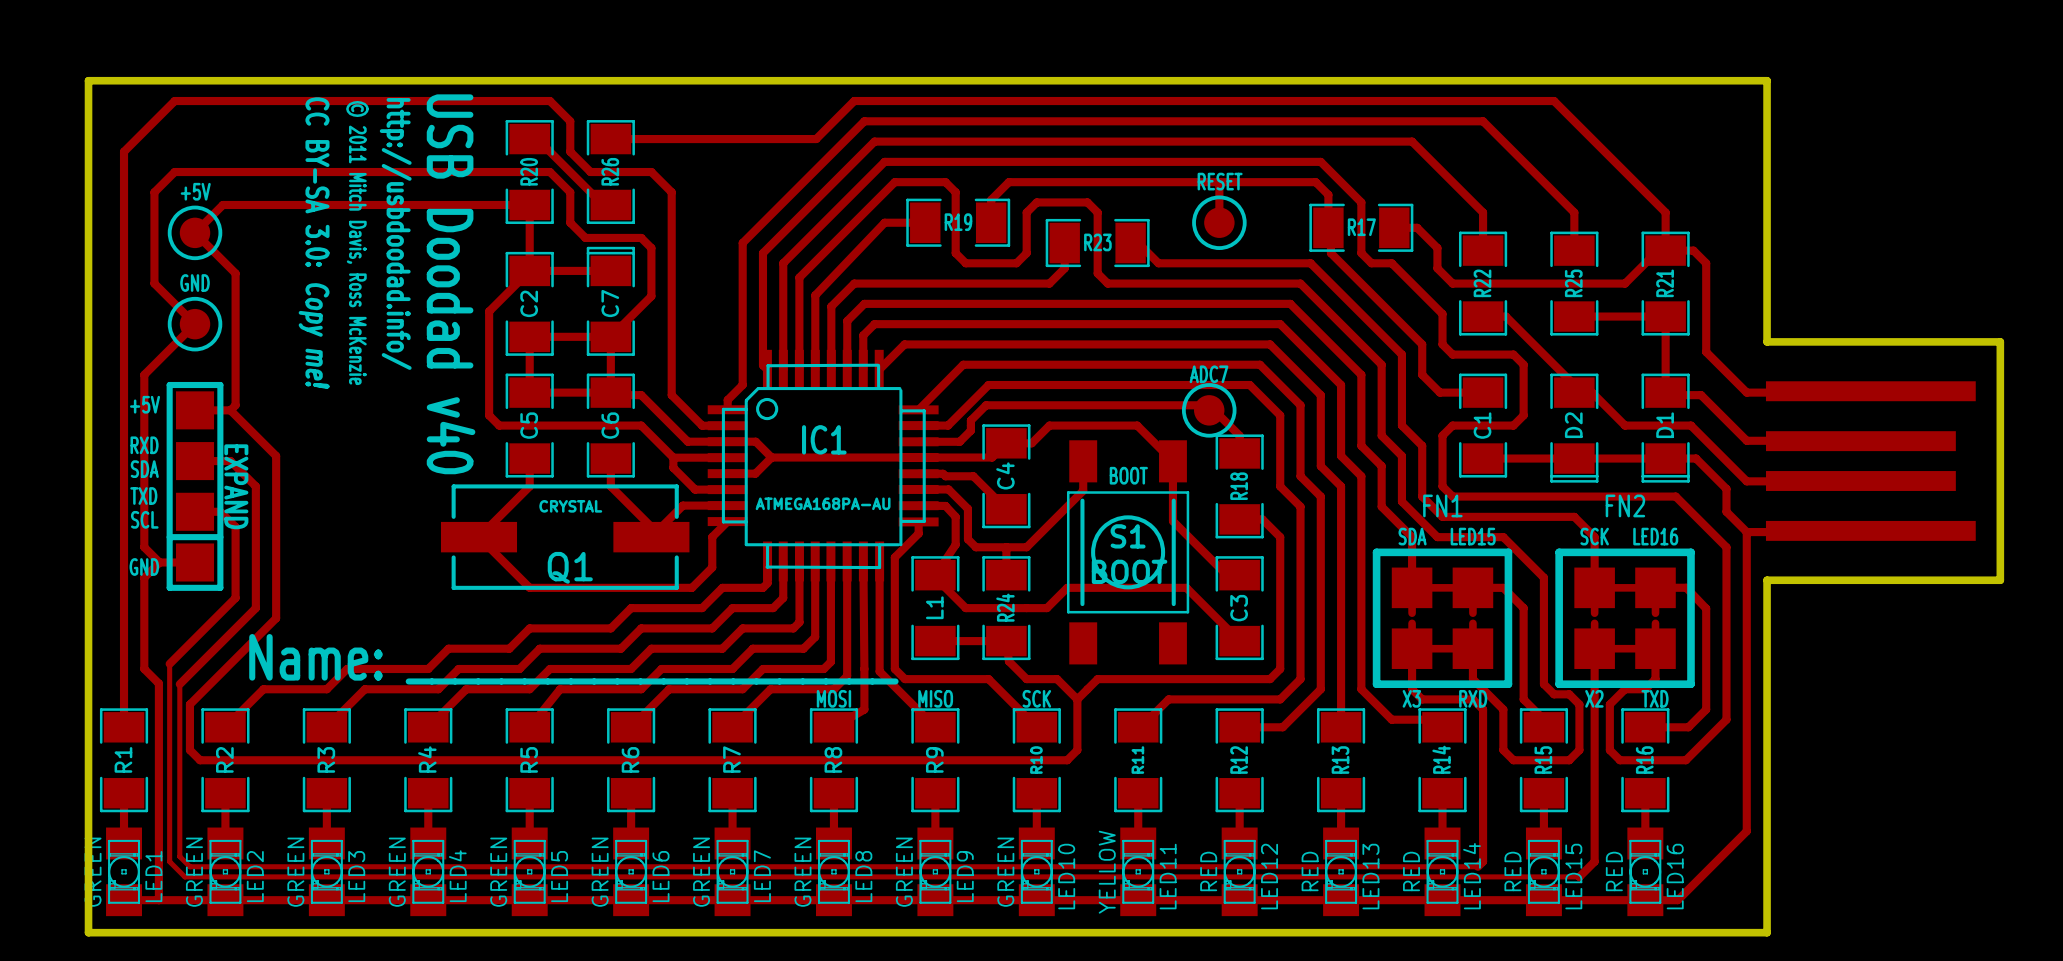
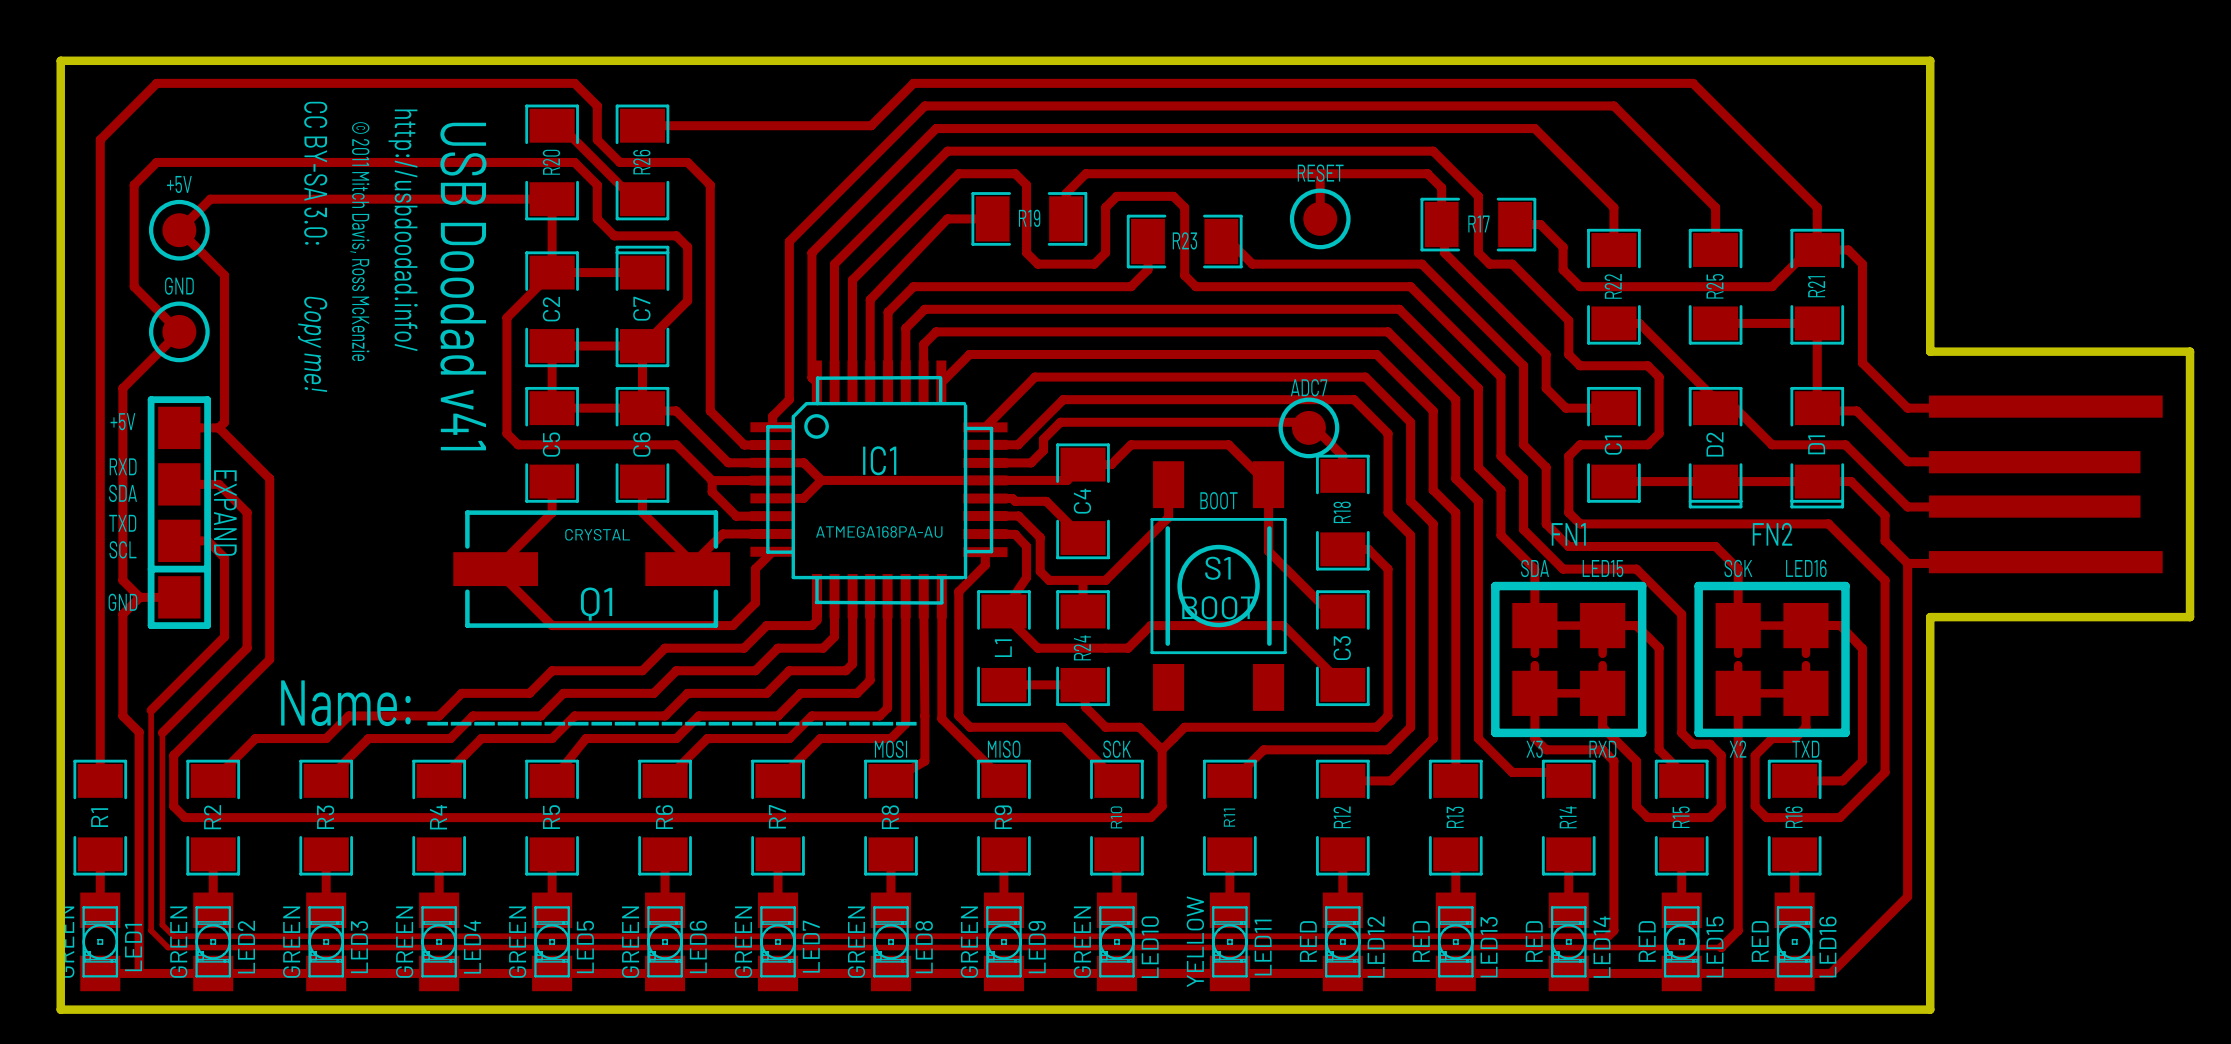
text: USB Doodad v40 (451, 284) -> USB Doodad v41 (463, 286)

